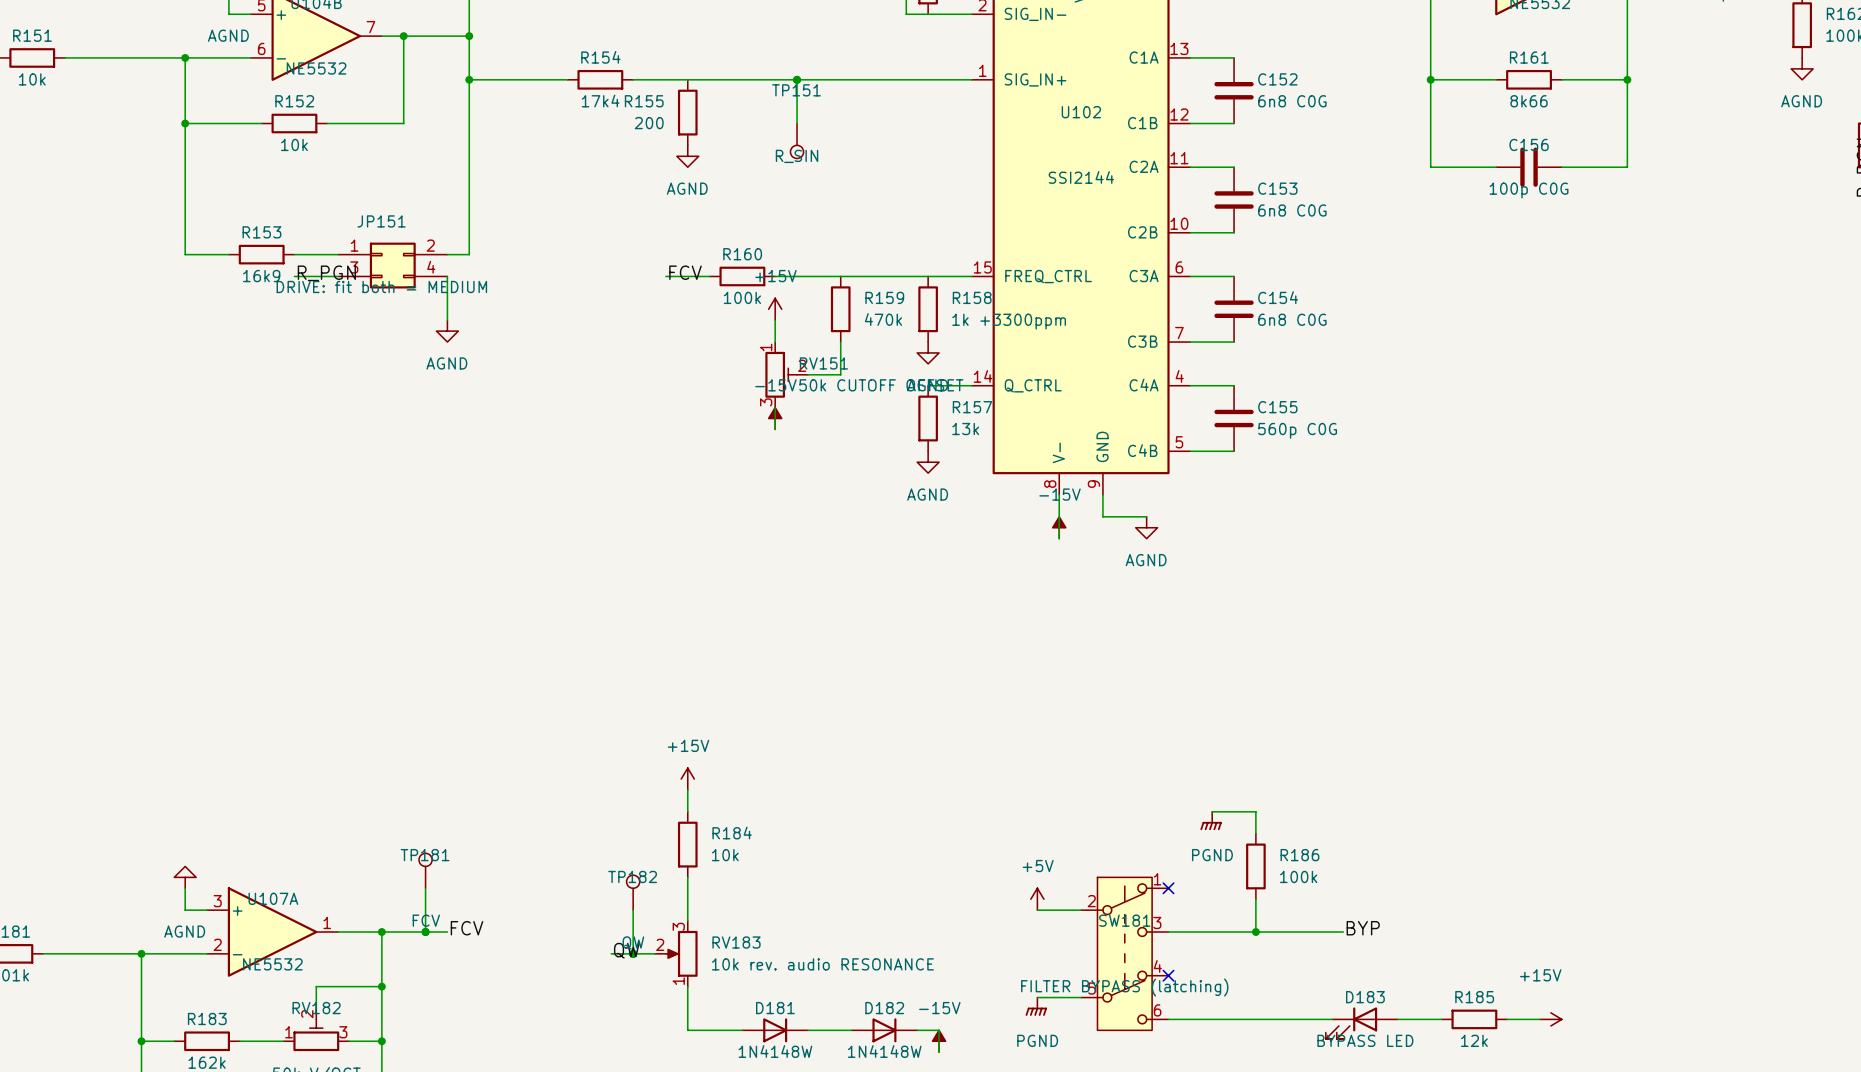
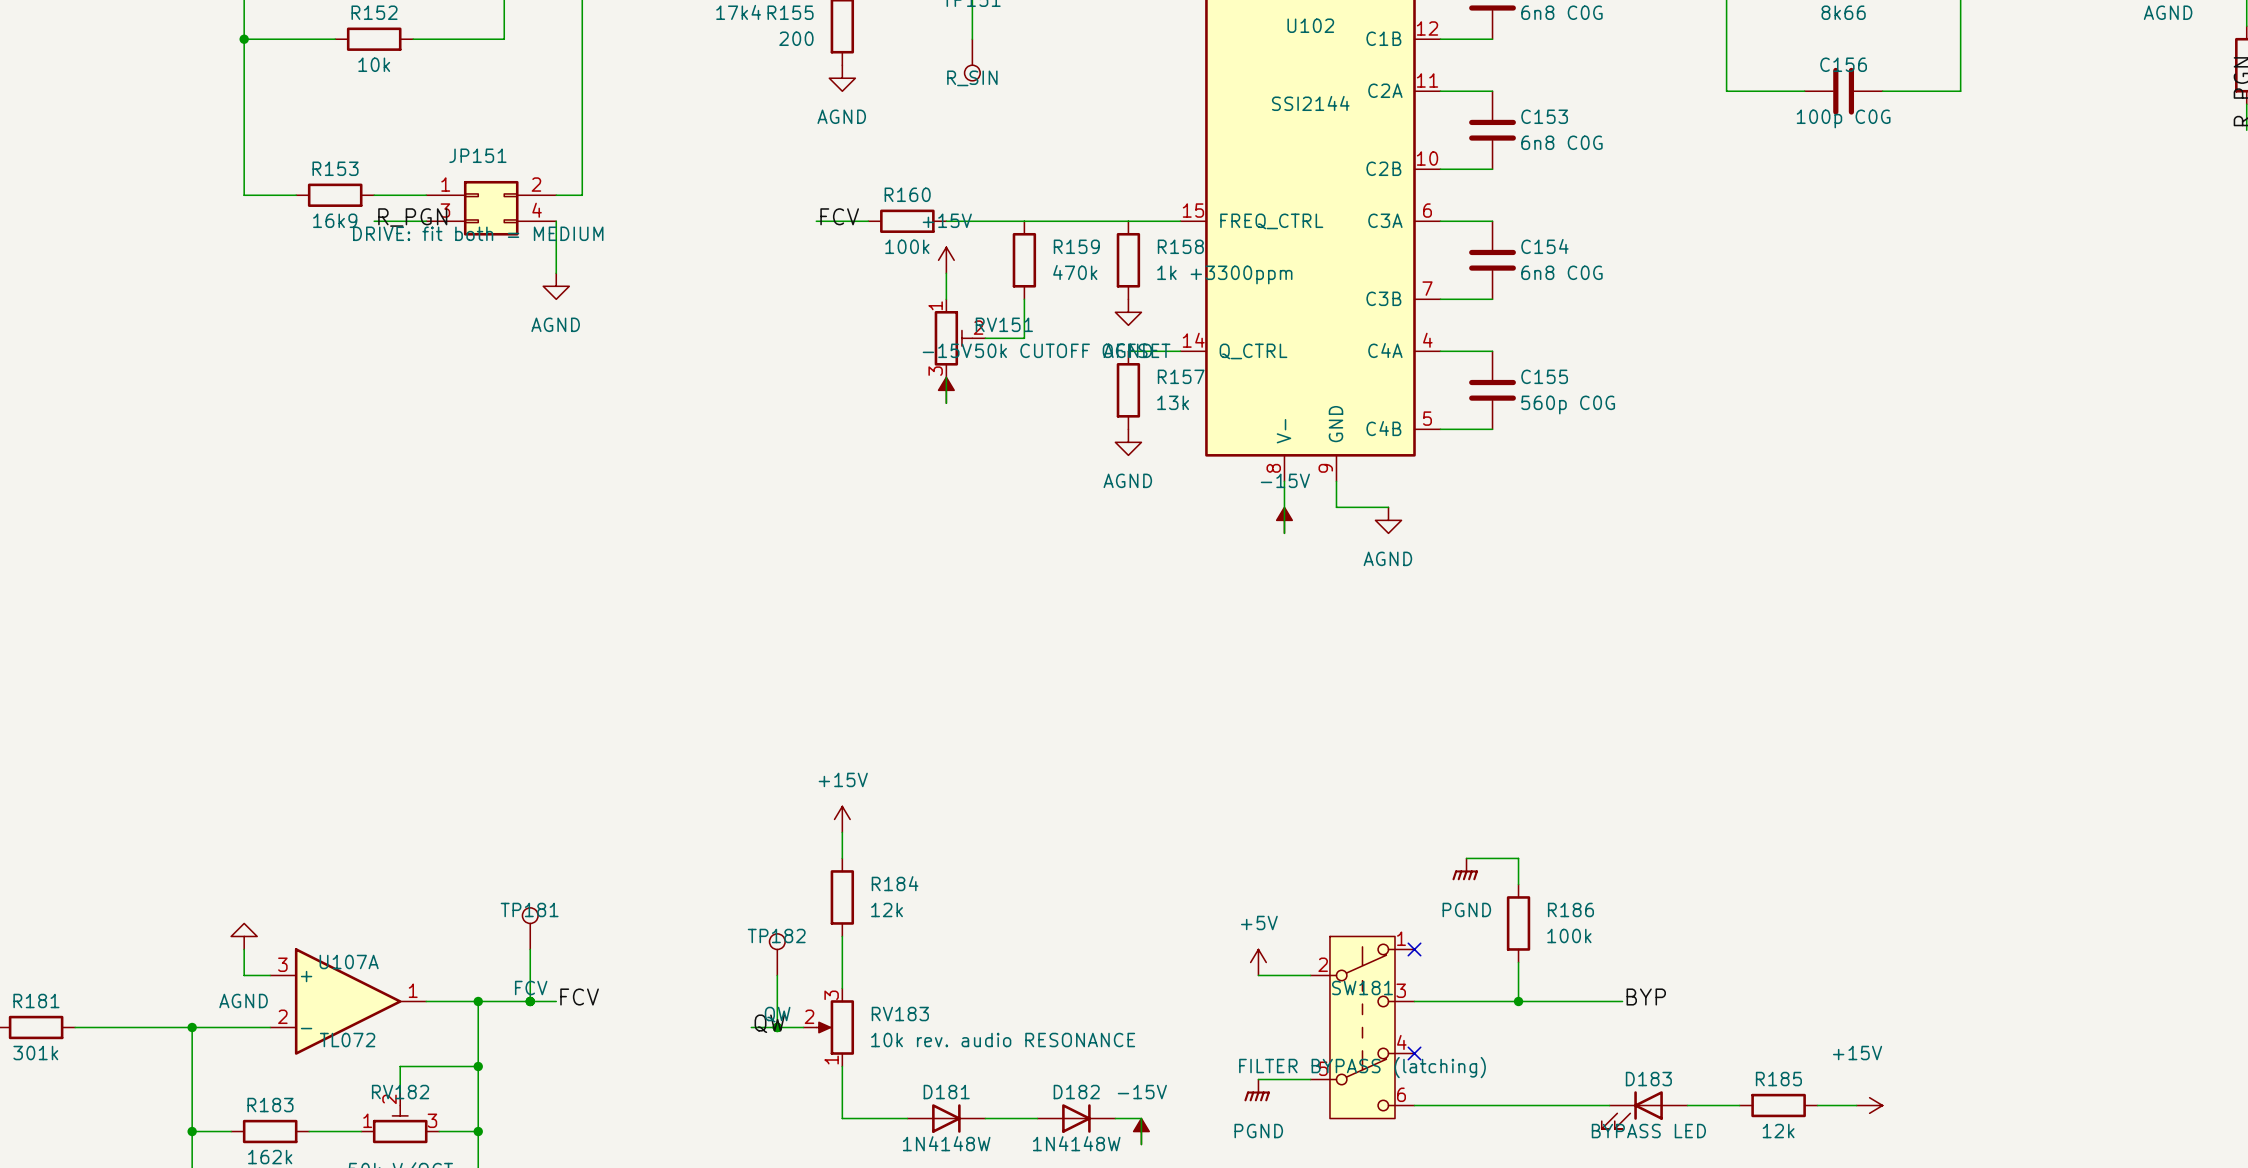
R184 value: 10k (725, 855) -> 12k (887, 909)
U107A value: NE5532 (272, 964) -> TL072 (347, 1040)

